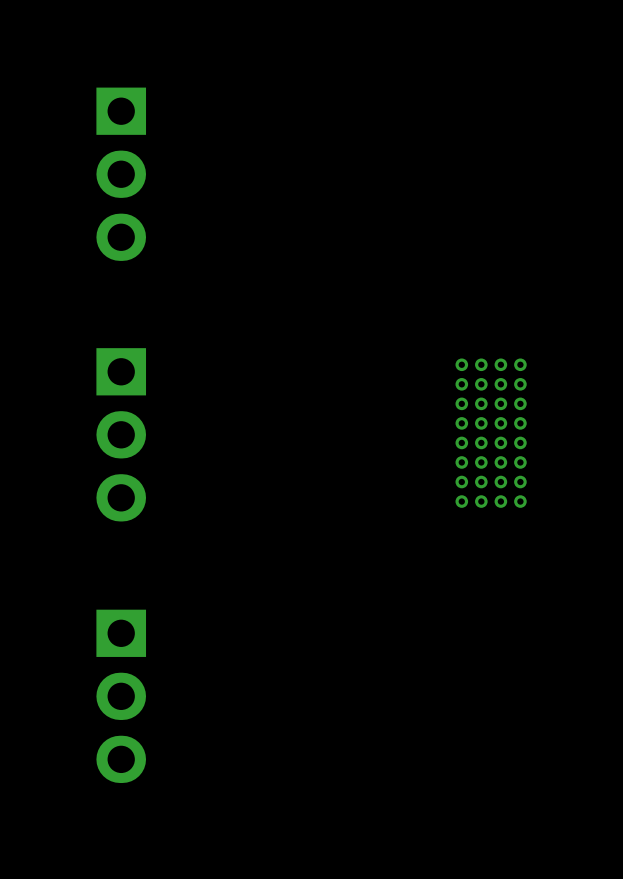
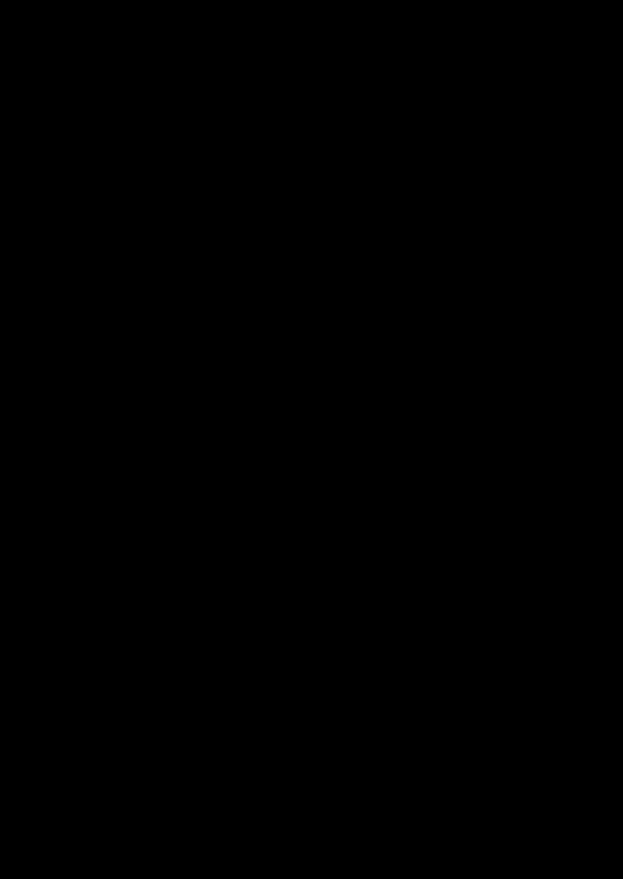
part: (121, 174) -> none
part: (491, 433) -> none
part: (121, 434) -> none
part: (121, 696) -> none

